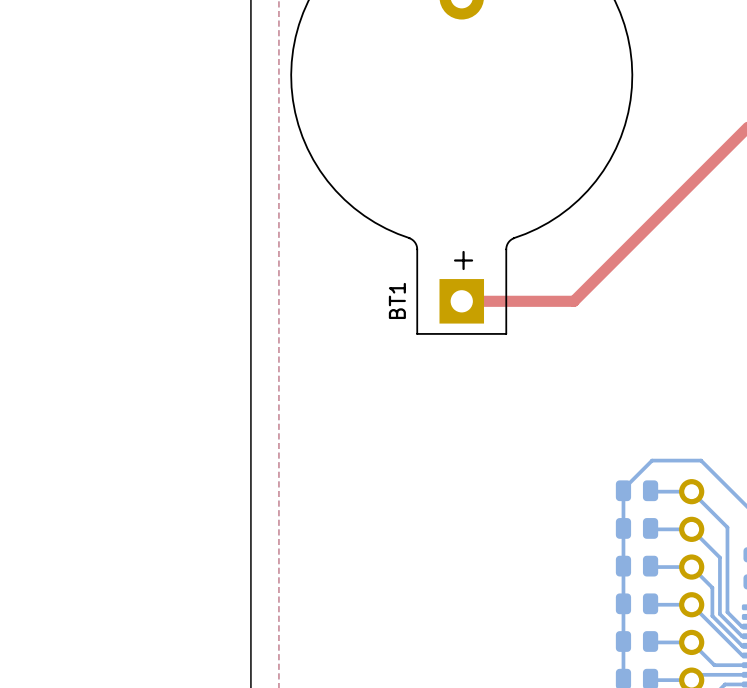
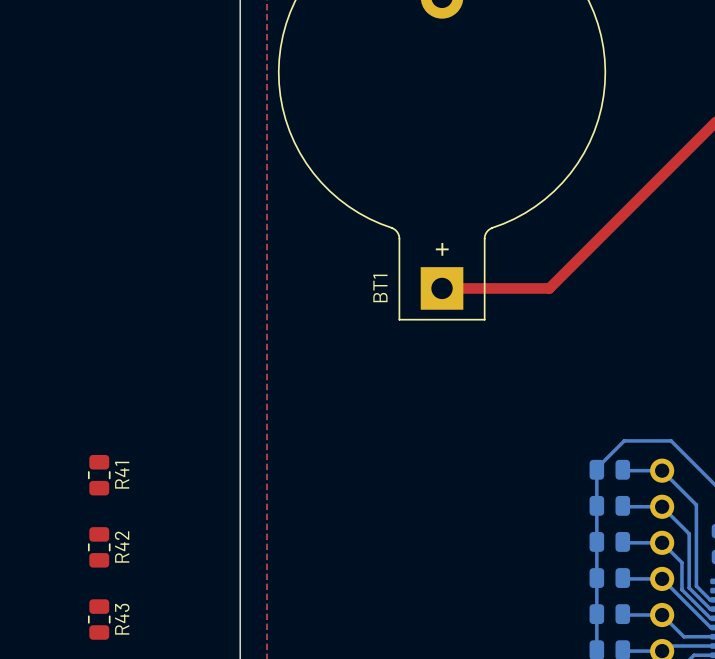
R41: none -> (99, 475)
R42: none -> (99, 547)
R43: none -> (99, 619)

